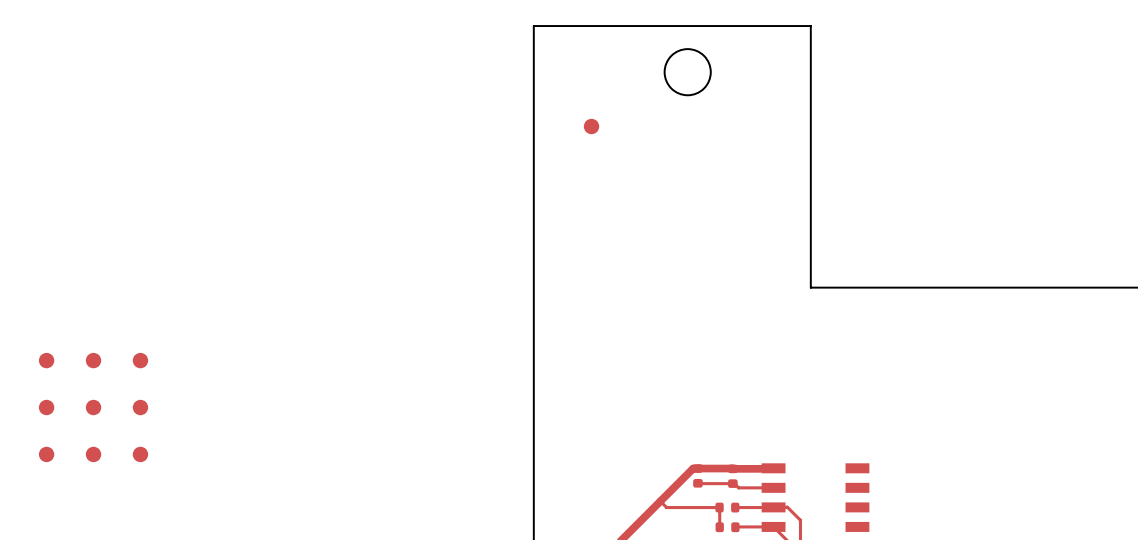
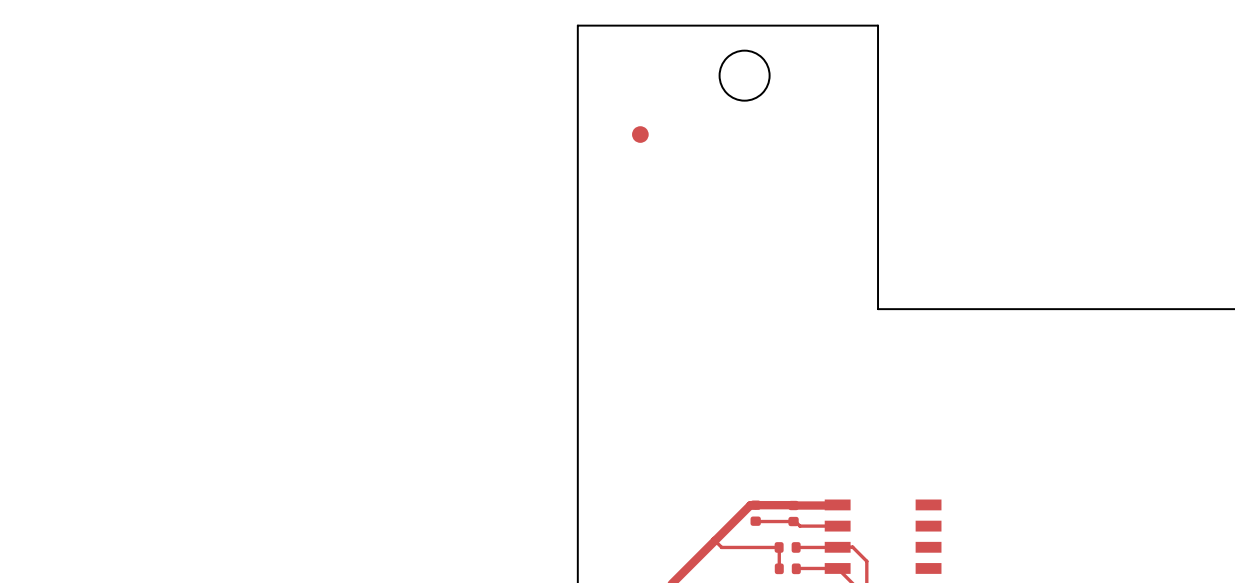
part: (46, 360) -> none
part: (93, 360) -> none
part: (140, 360) -> none
part: (46, 407) -> none
part: (93, 407) -> none
part: (140, 407) -> none
part: (46, 454) -> none
part: (93, 454) -> none
part: (140, 454) -> none

